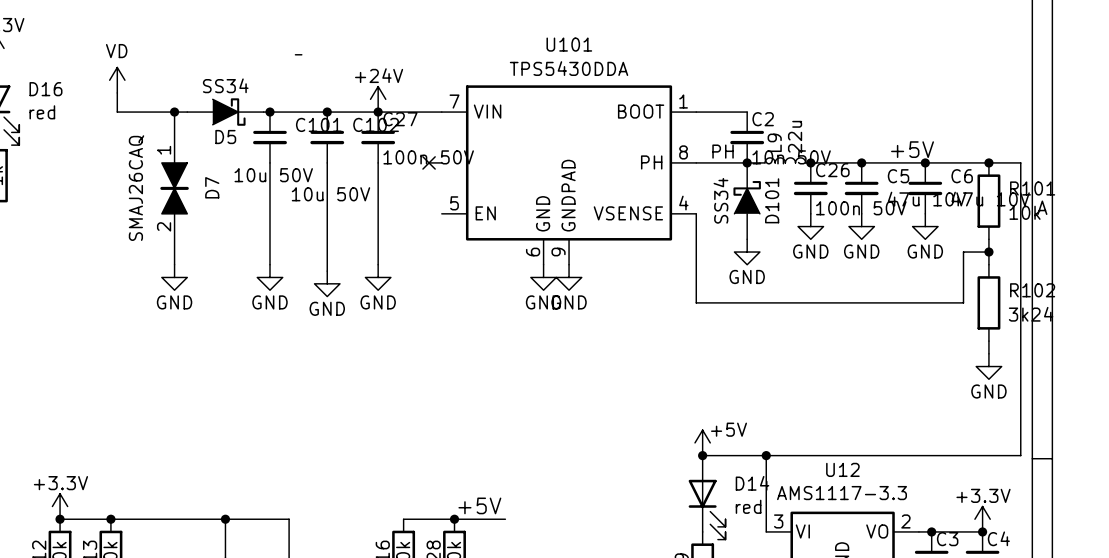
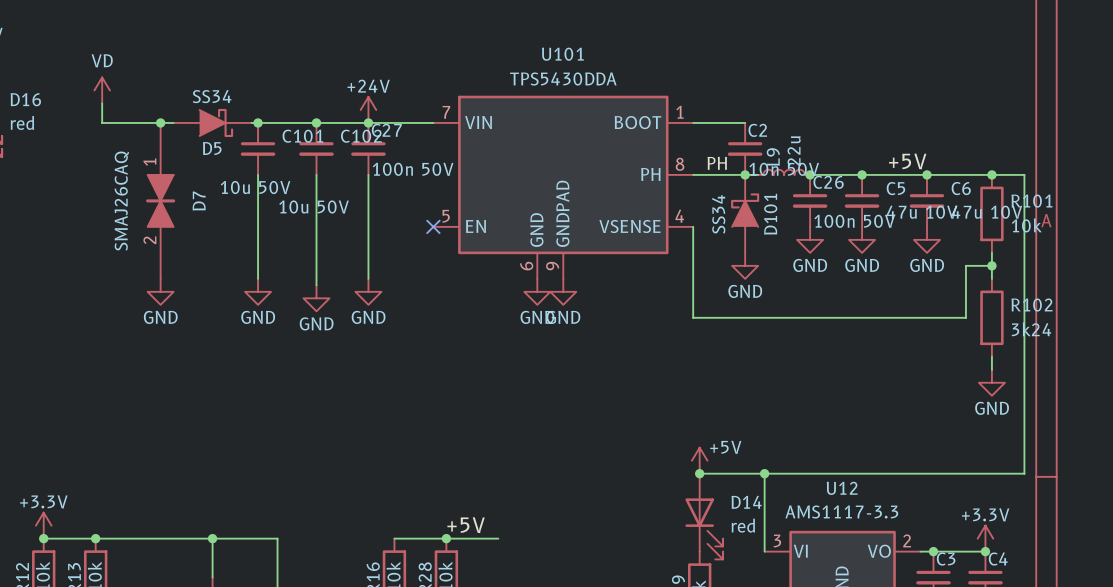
wire: (295, 54) (301, 54) -> none
wire: (429, 162) (441, 162) -> none
no-connect mark position: (429, 162) -> (433, 226)

